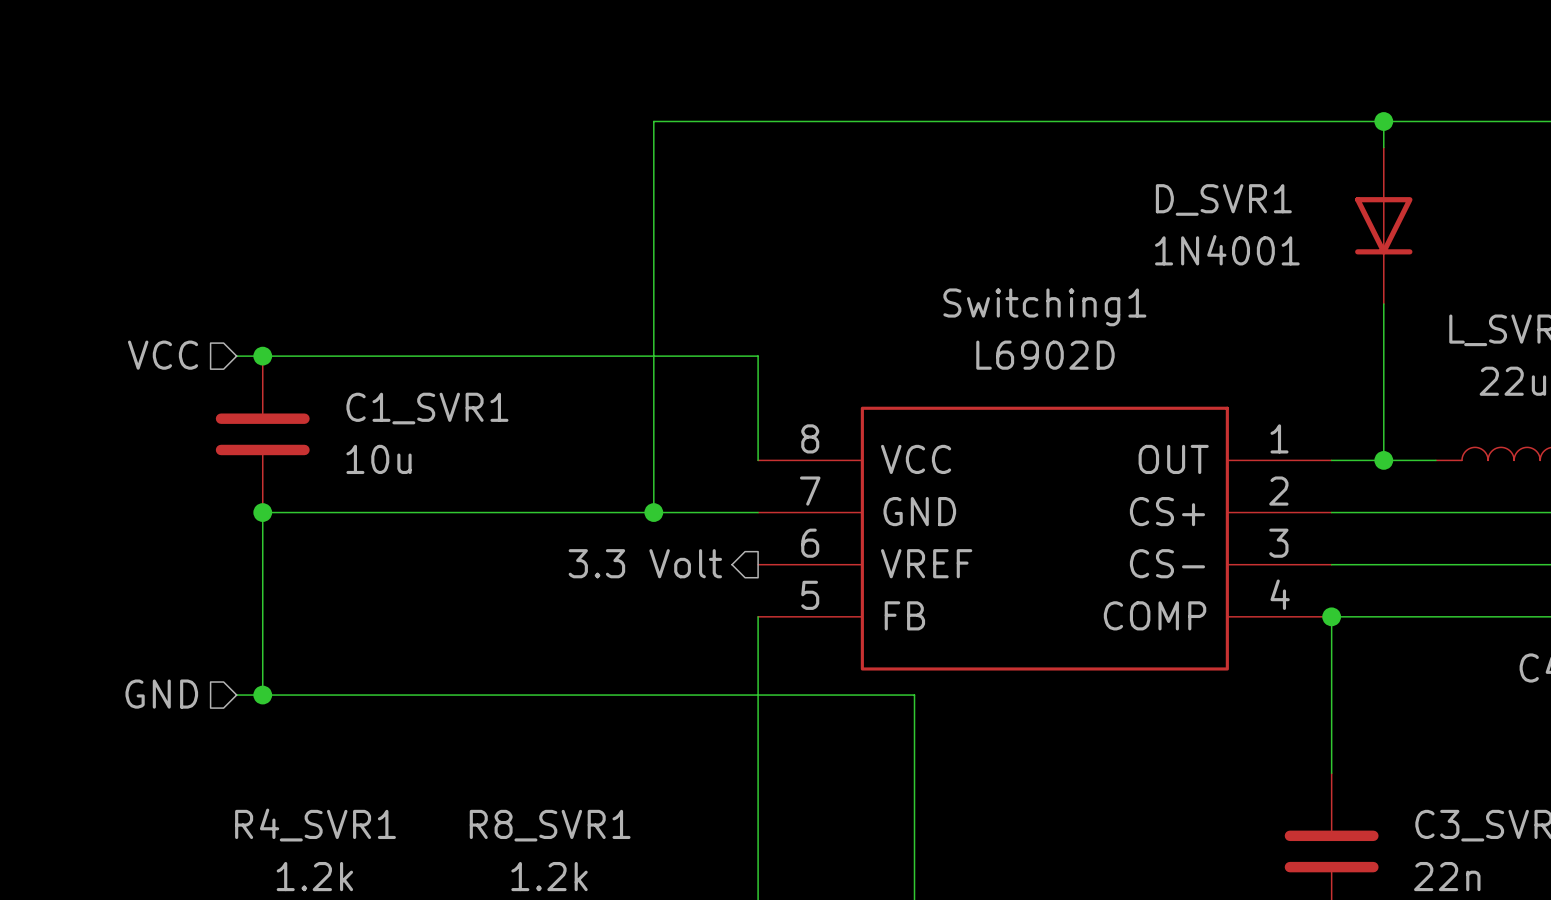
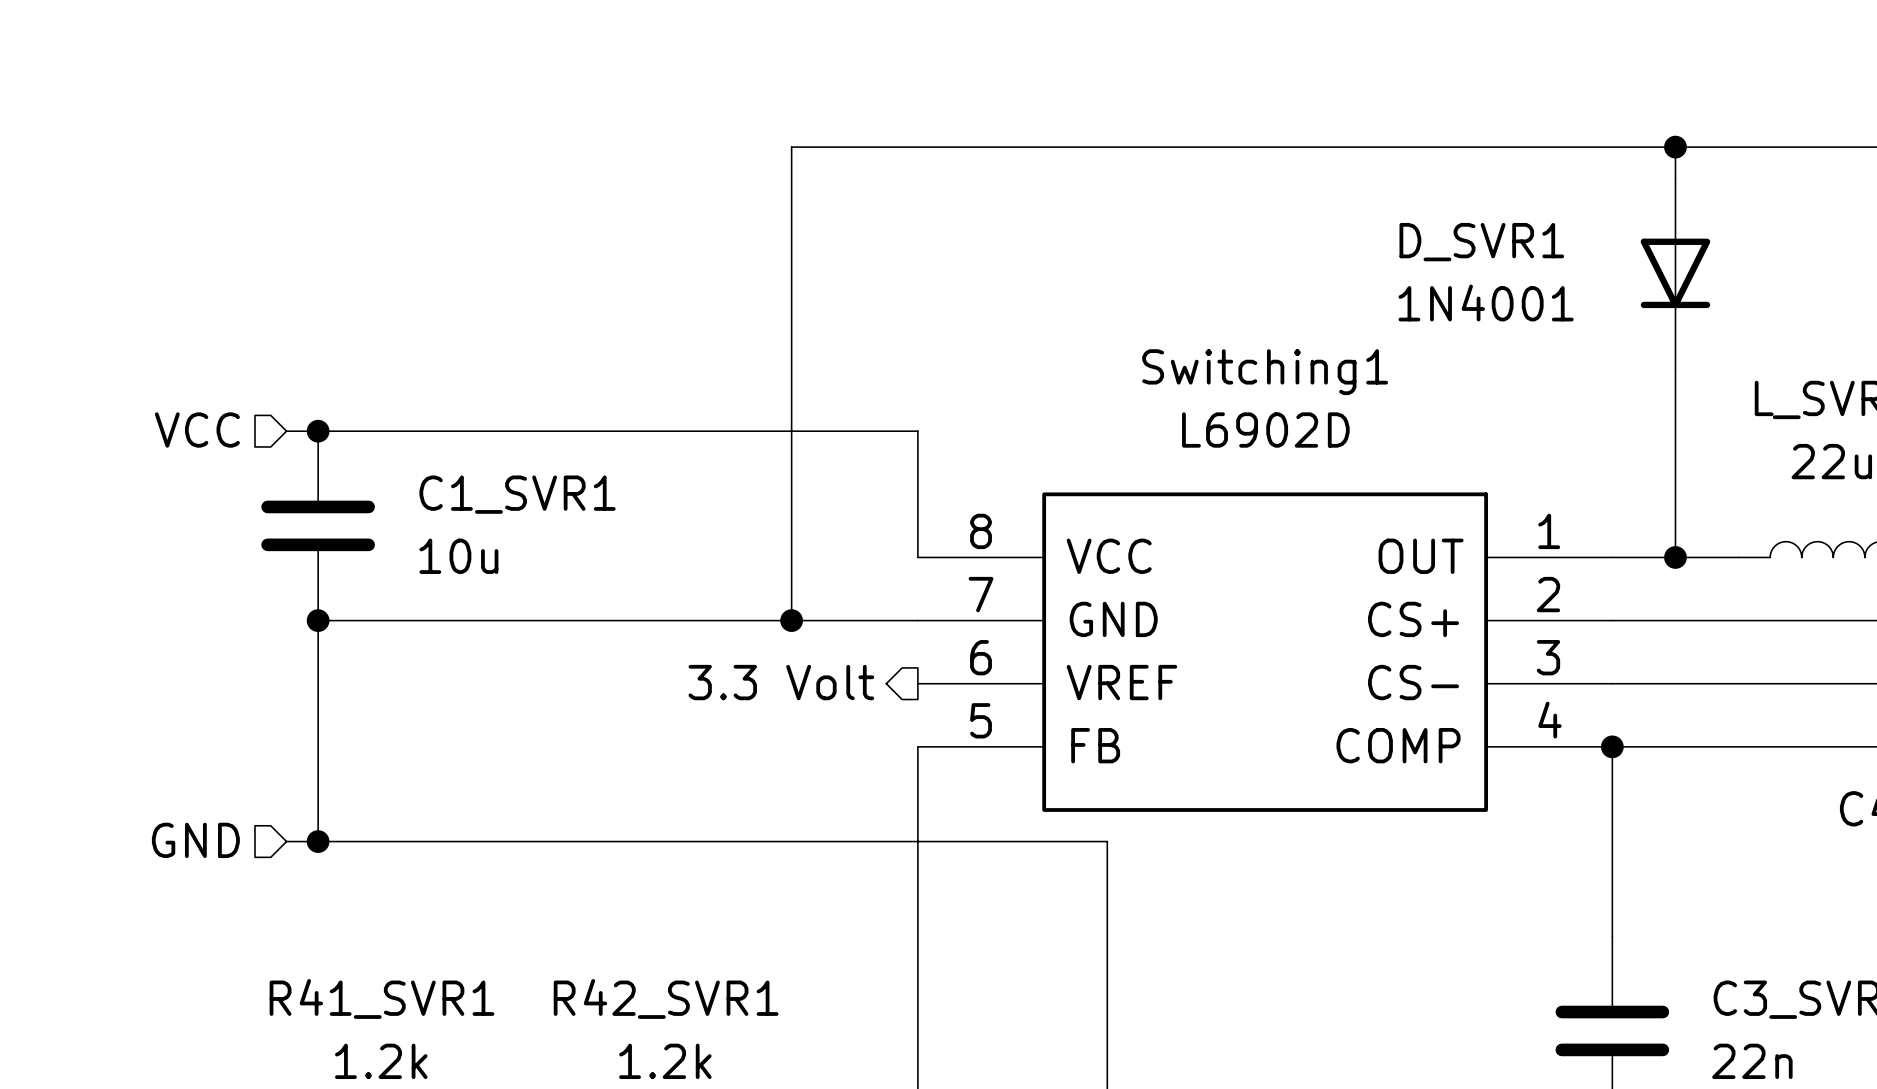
R4_SVR1 name: R4_SVR1 (315, 825) -> R41_SVR1 (382, 998)
R8_SVR1 name: R8_SVR1 (550, 825) -> R42_SVR1 (666, 998)

